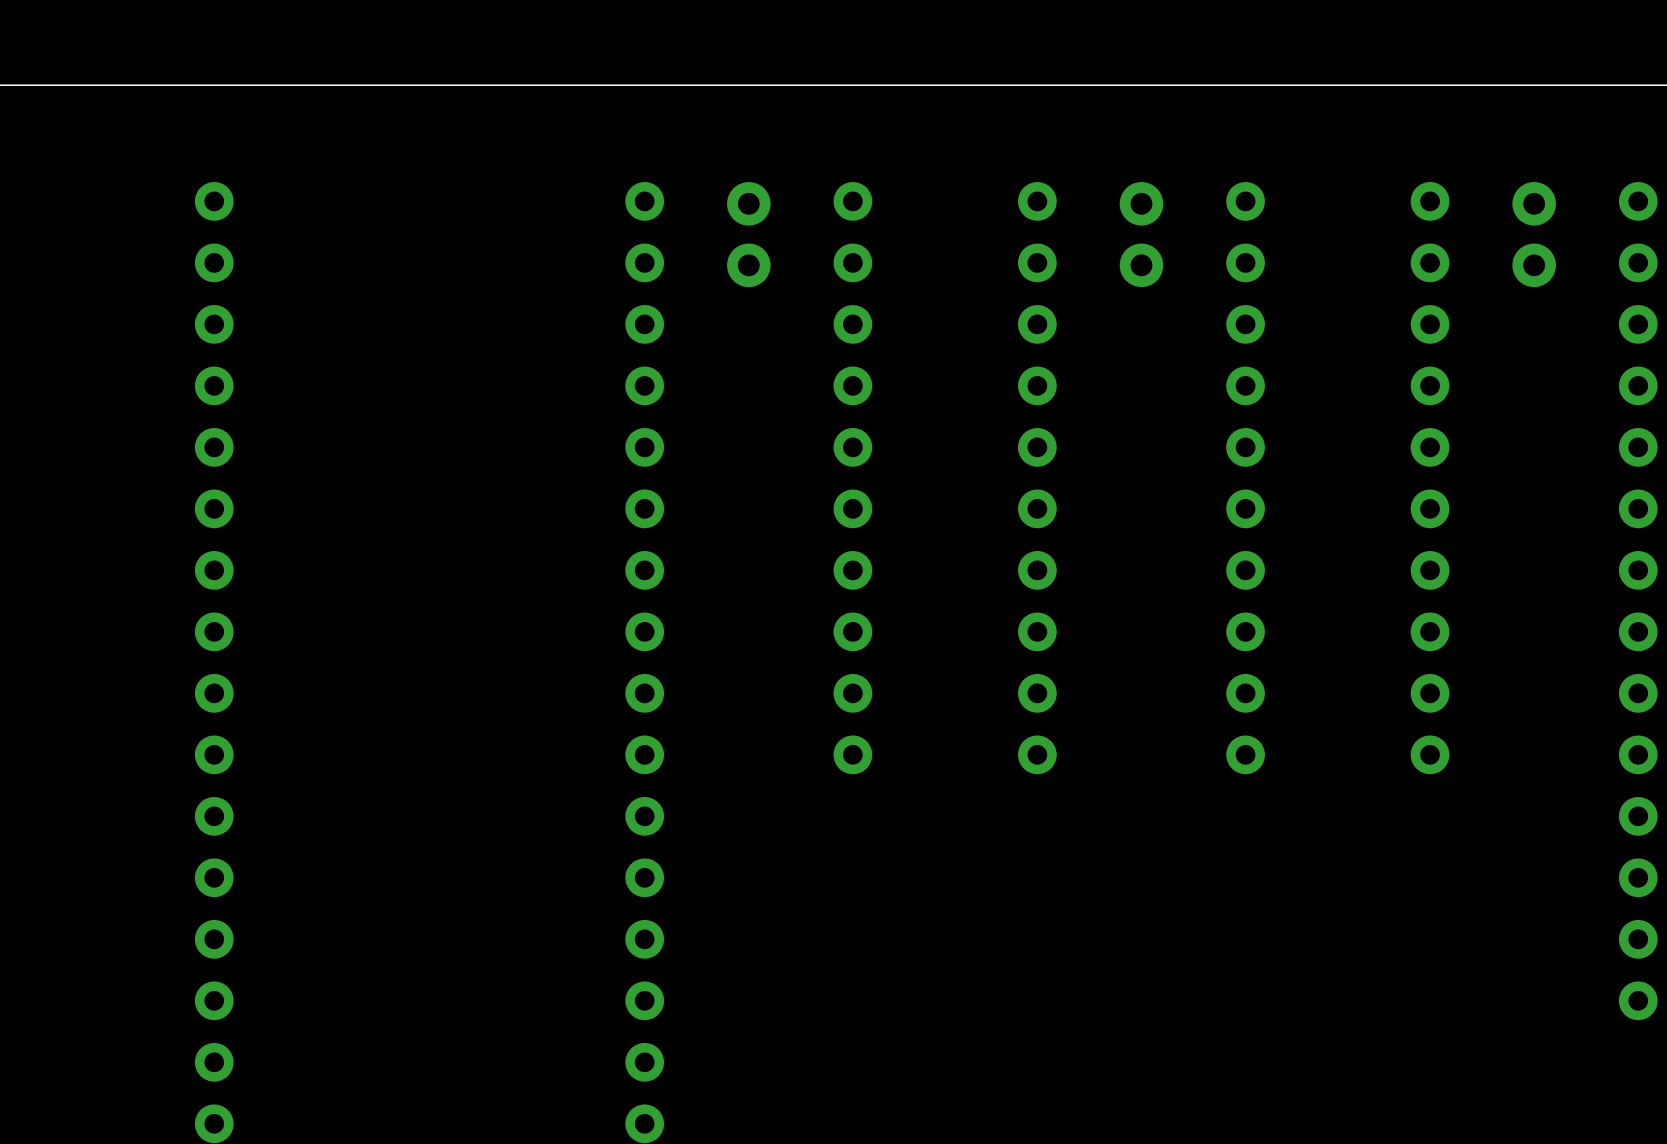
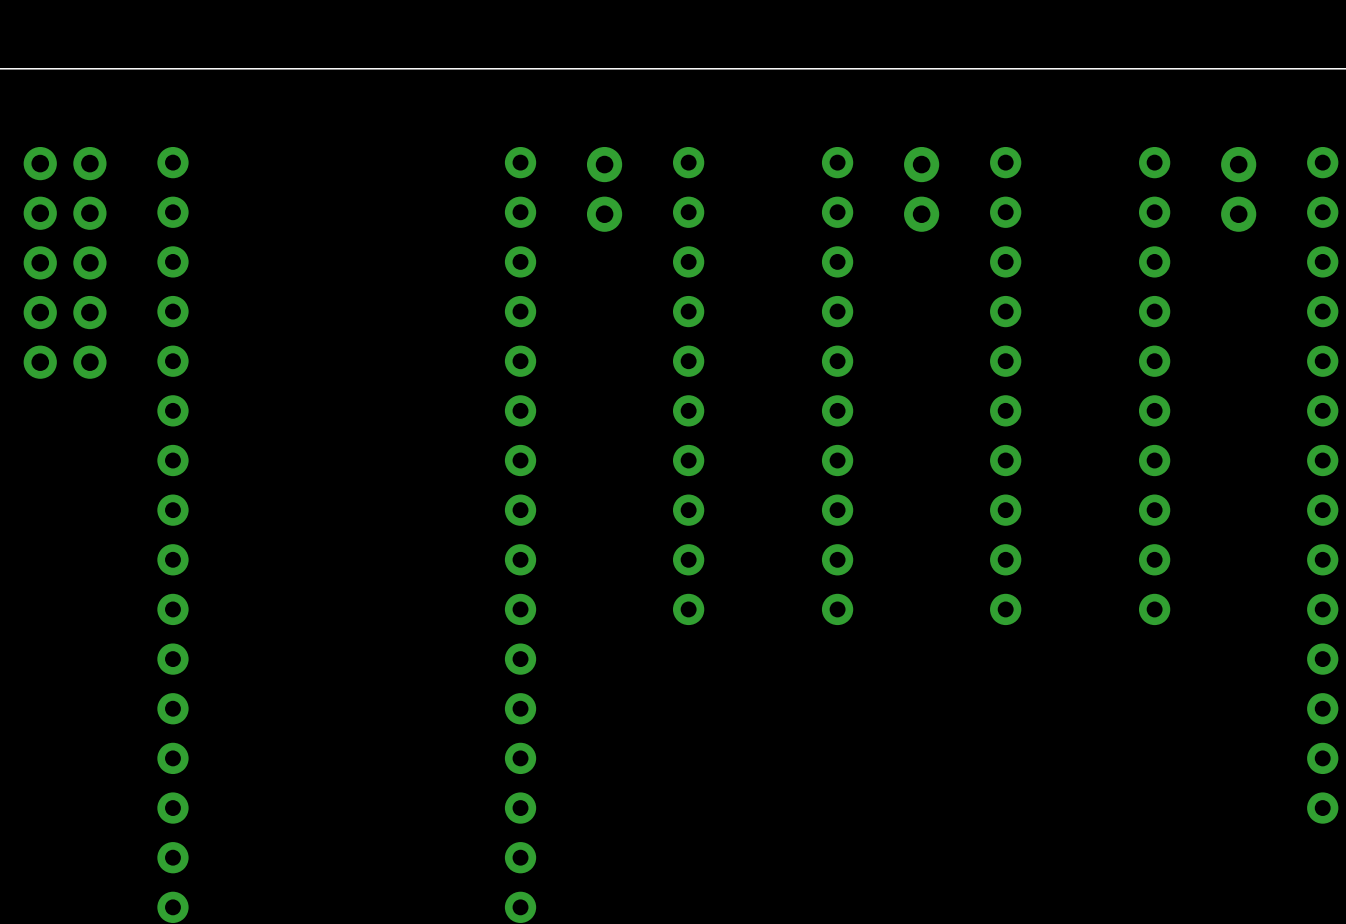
part: none -> (65, 262)

